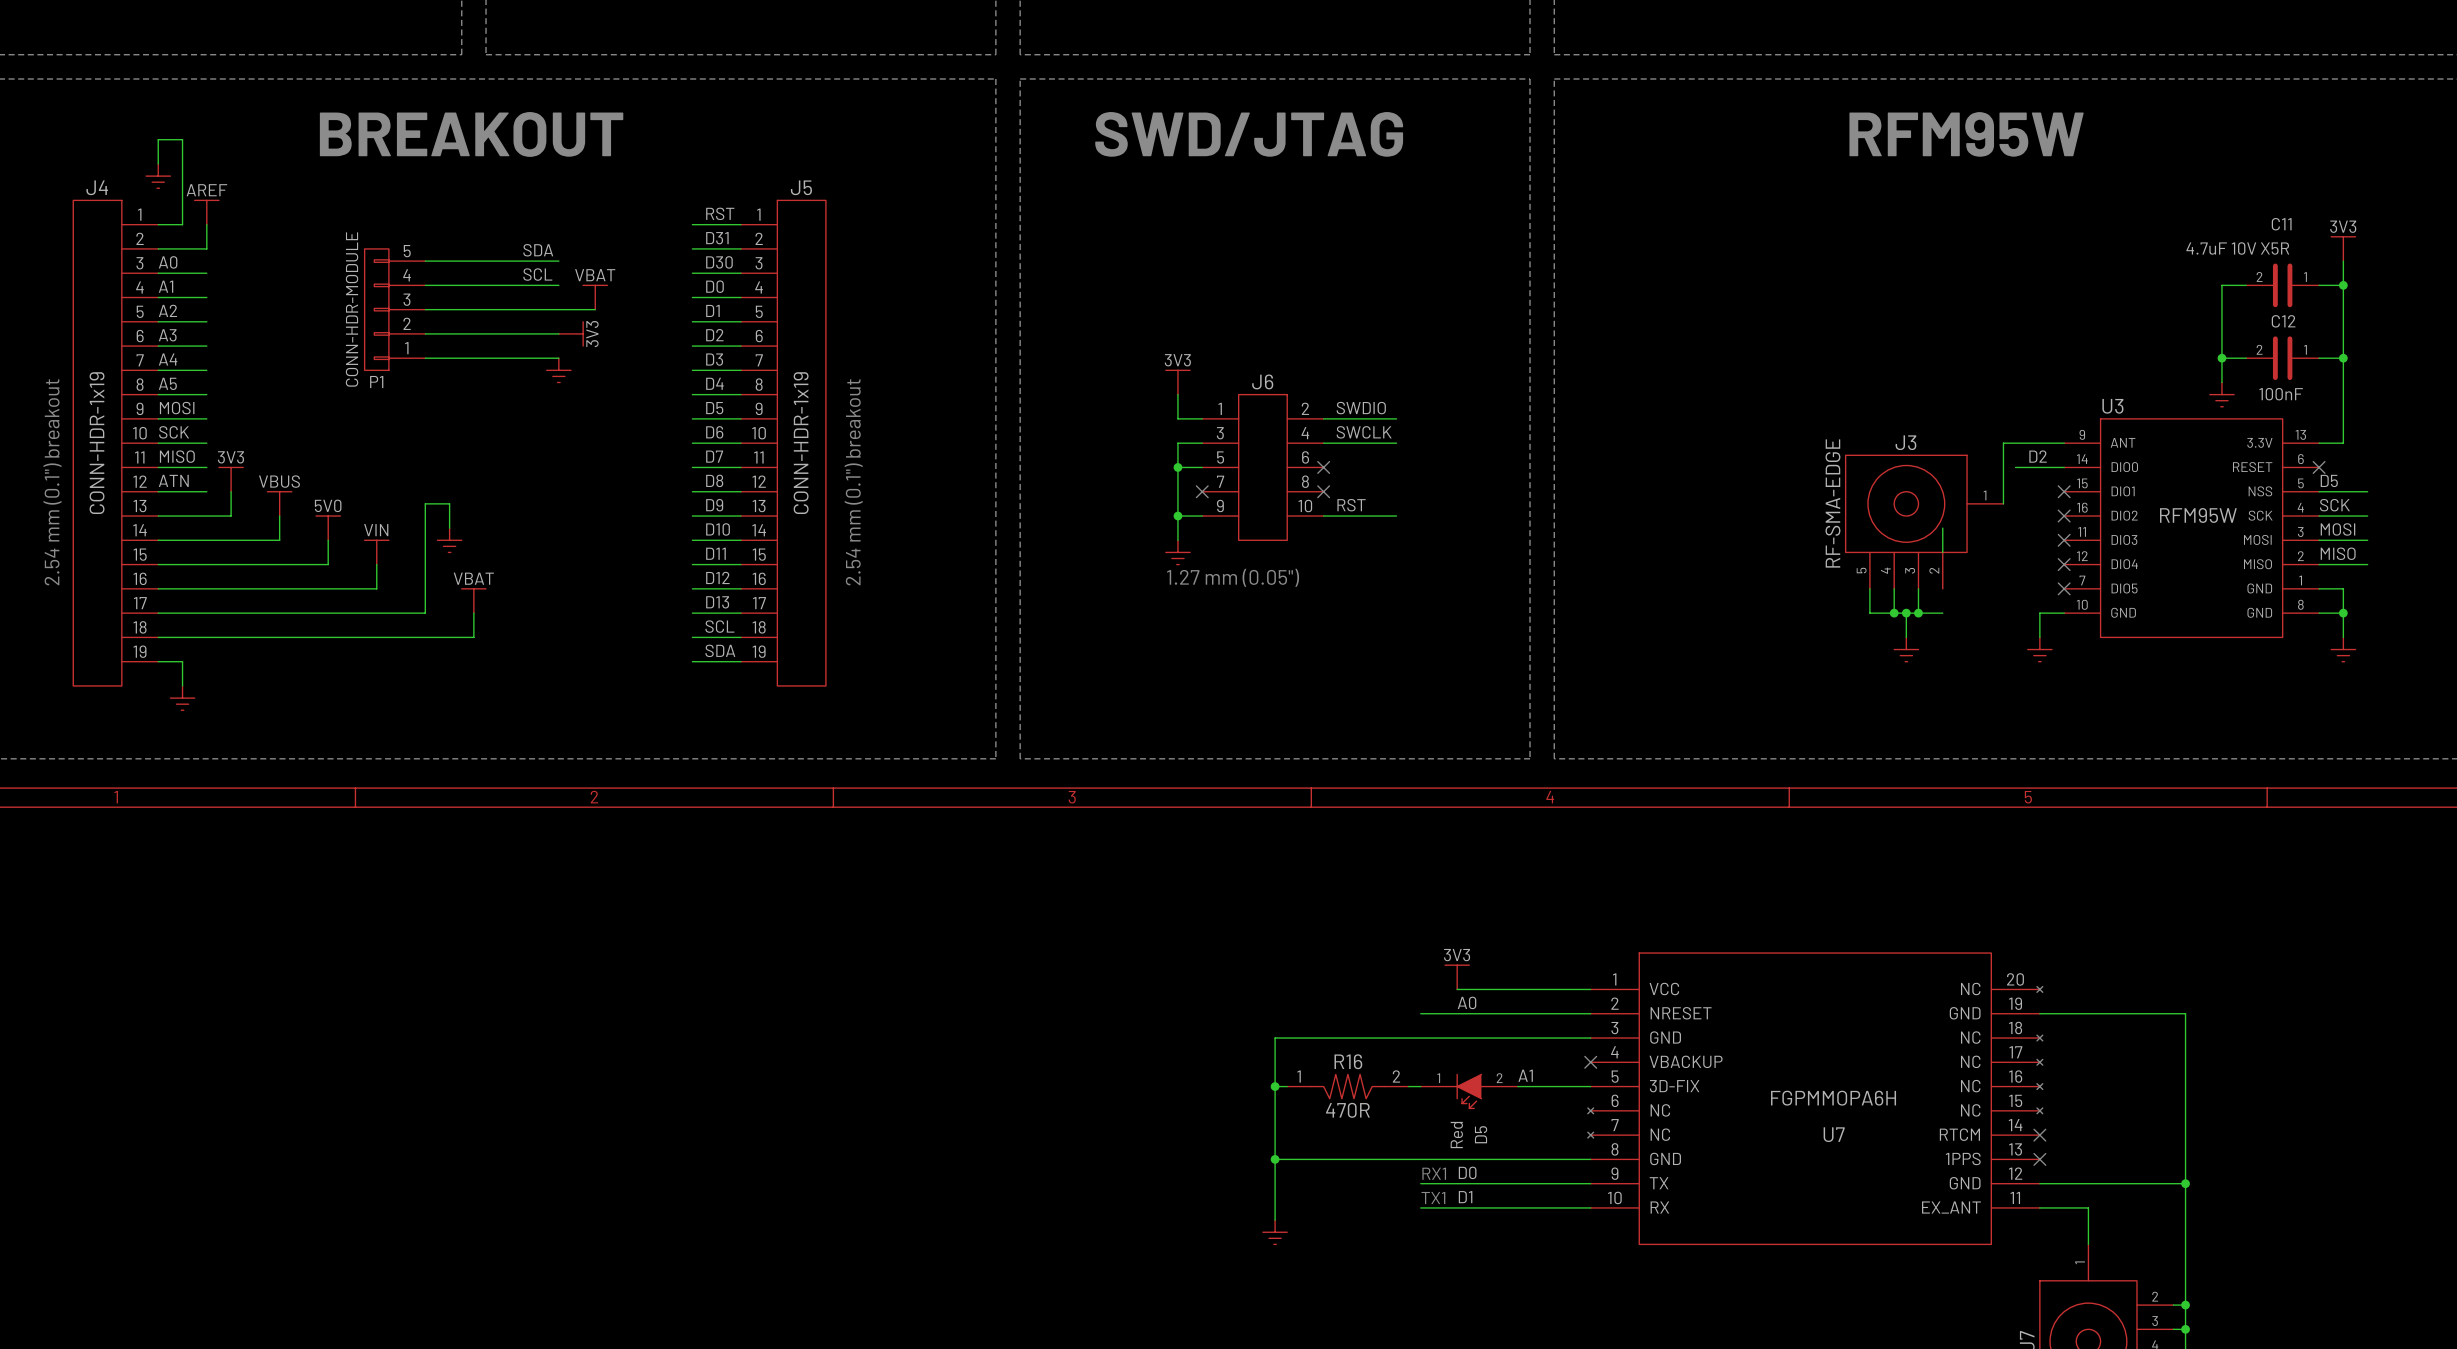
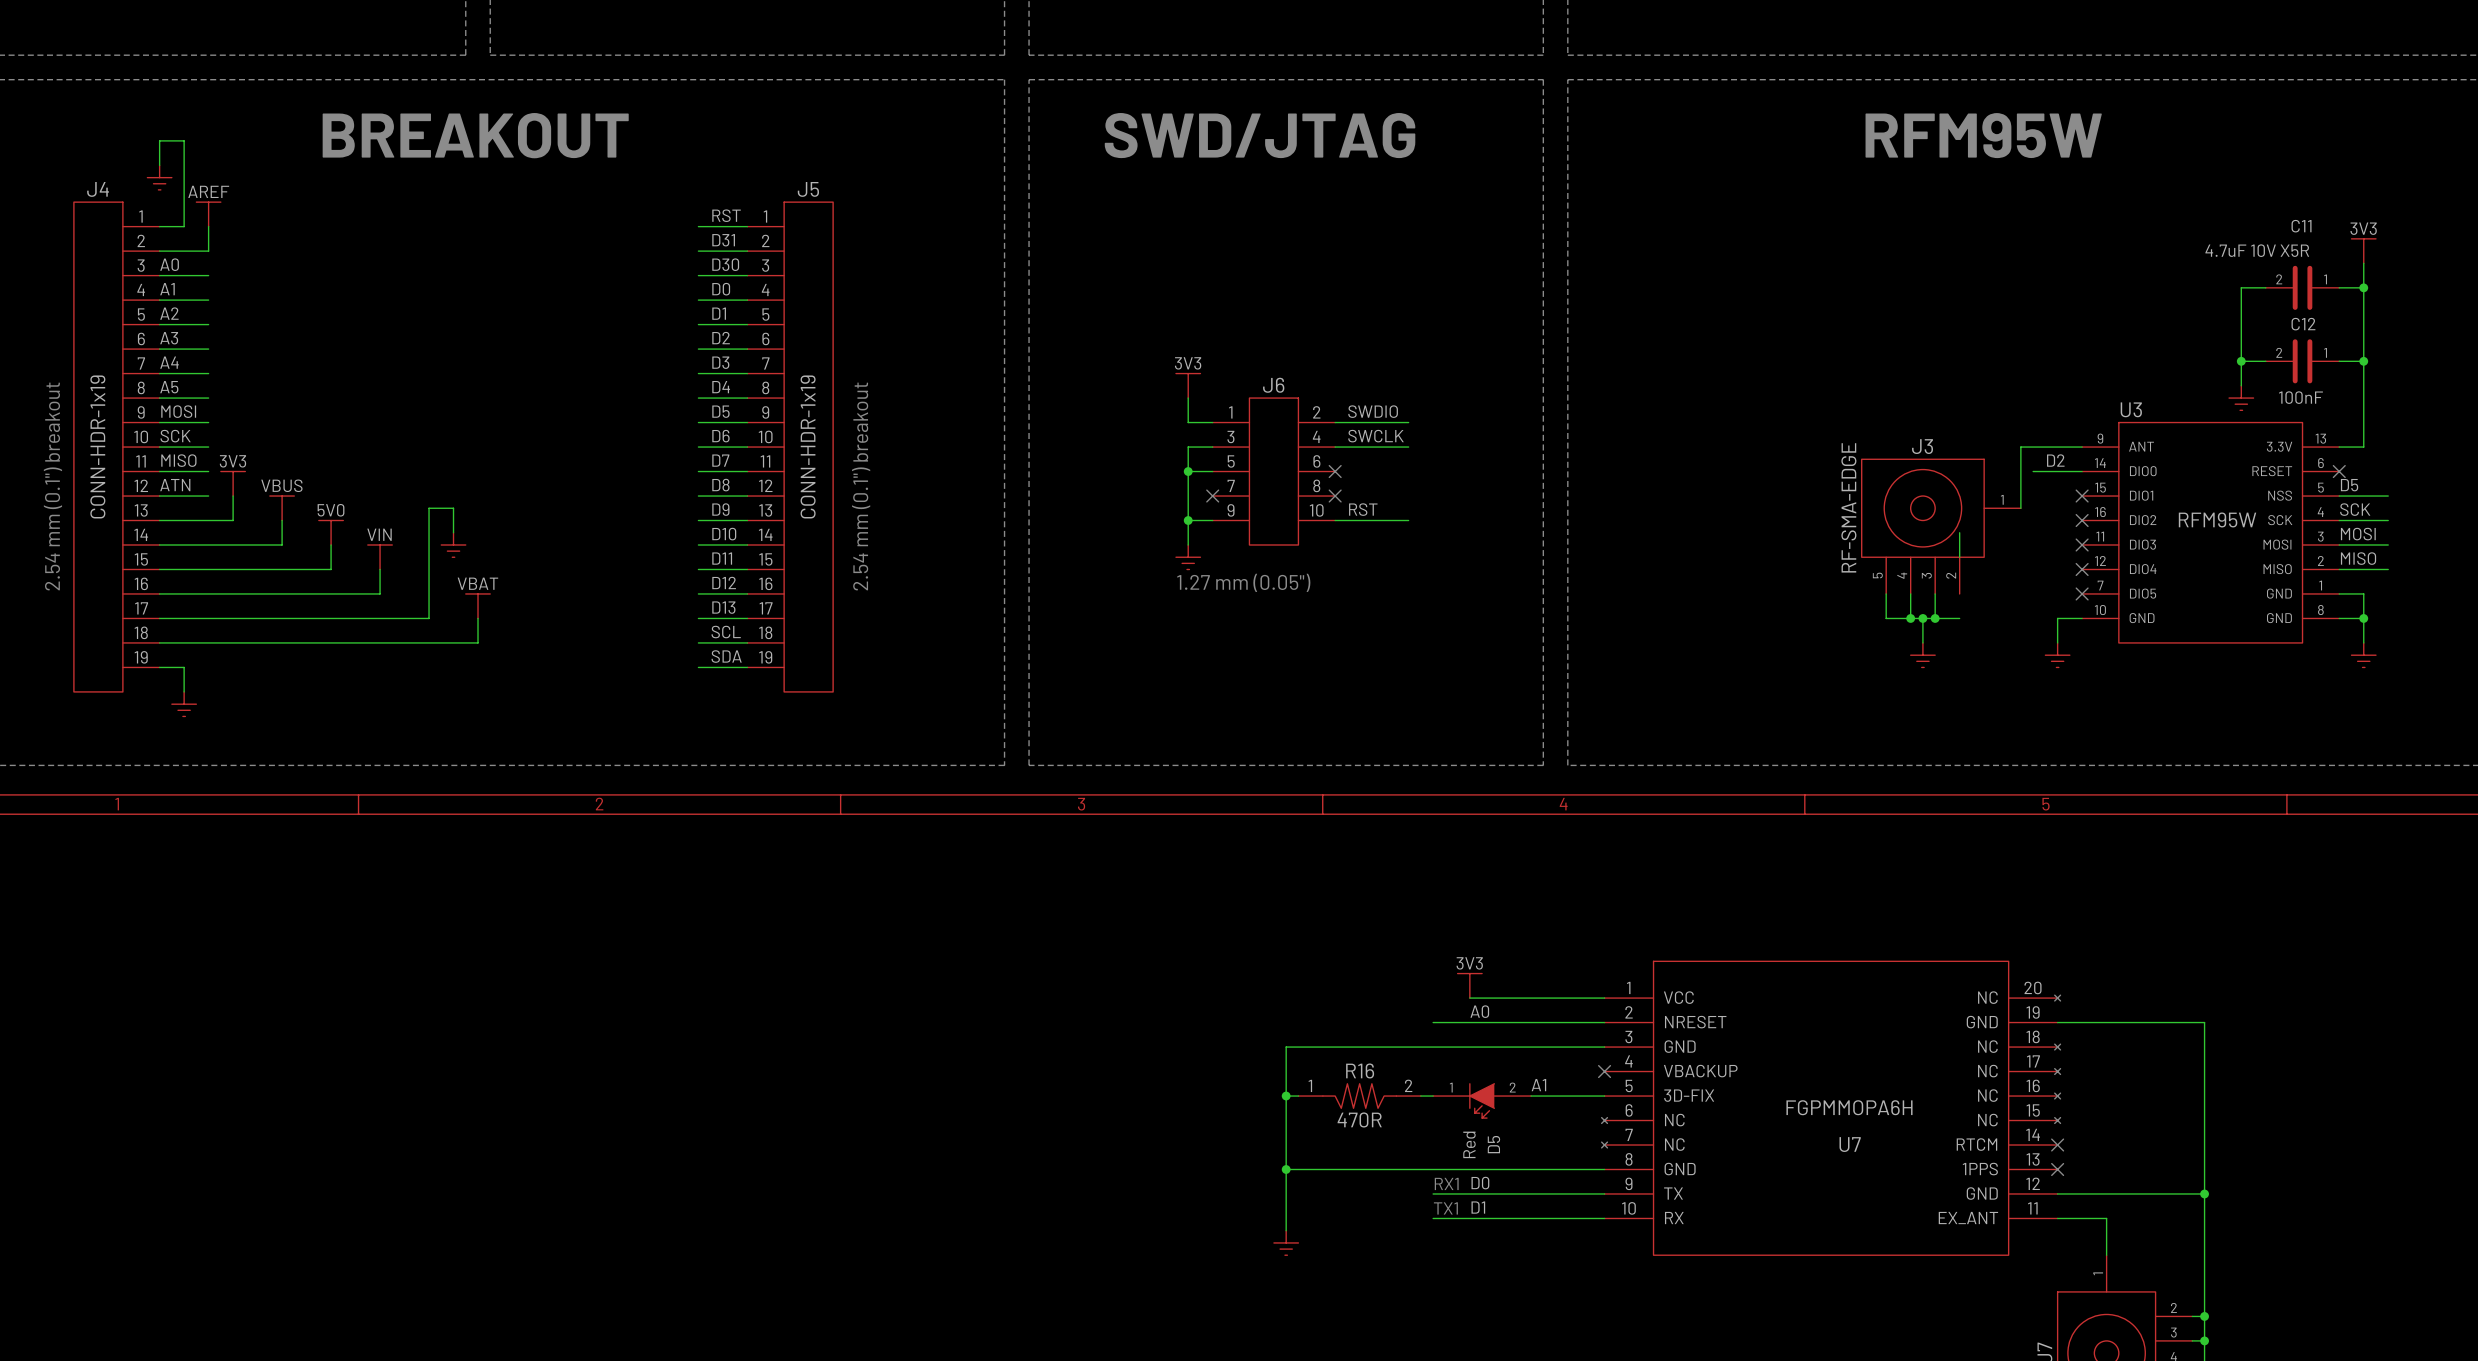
label: SDA (538, 250) -> none
wire: (425, 261) (558, 261) -> none
label: SCL (537, 274) -> none
wire: (425, 285) (558, 285) -> none
power symbol: VBAT (595, 297) -> none
P1: CONN-HDR-MODULE (394, 309) -> none
wire: (425, 309) (595, 309) -> none
wire: (425, 333) (558, 333) -> none
power symbol: 3V3 (570, 333) -> none
wire: (425, 358) (558, 358) -> none
power symbol: (558, 370) -> none

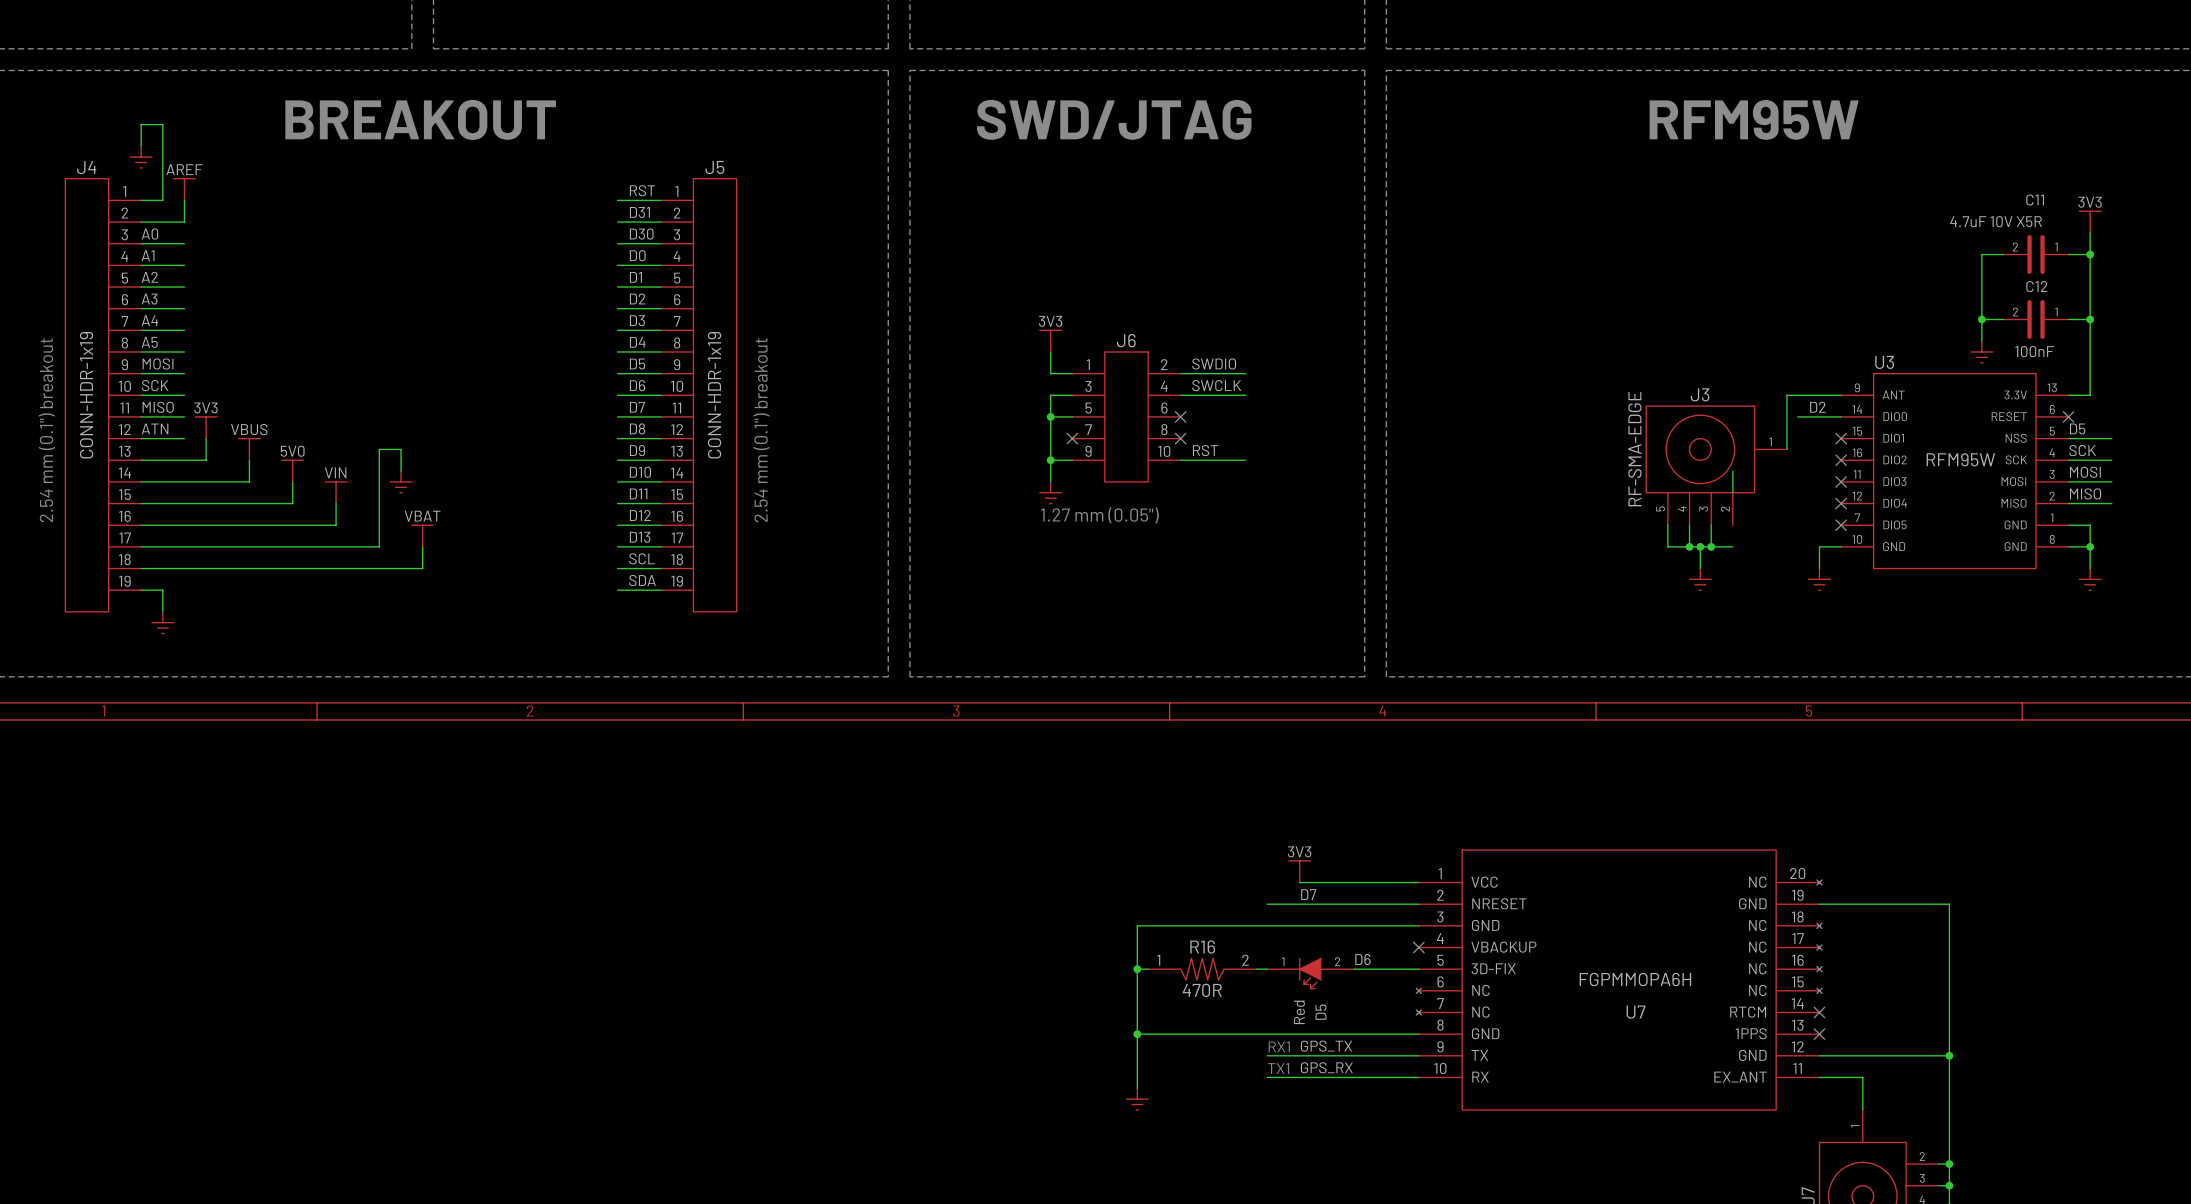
label: A0 (1479, 1011) -> D7 (1308, 894)
label: A1 (1538, 1085) -> D6 (1362, 959)
label: D0 (1480, 1183) -> GPS_TX (1326, 1046)
label: D1 (1478, 1207) -> GPS_RX (1326, 1067)

